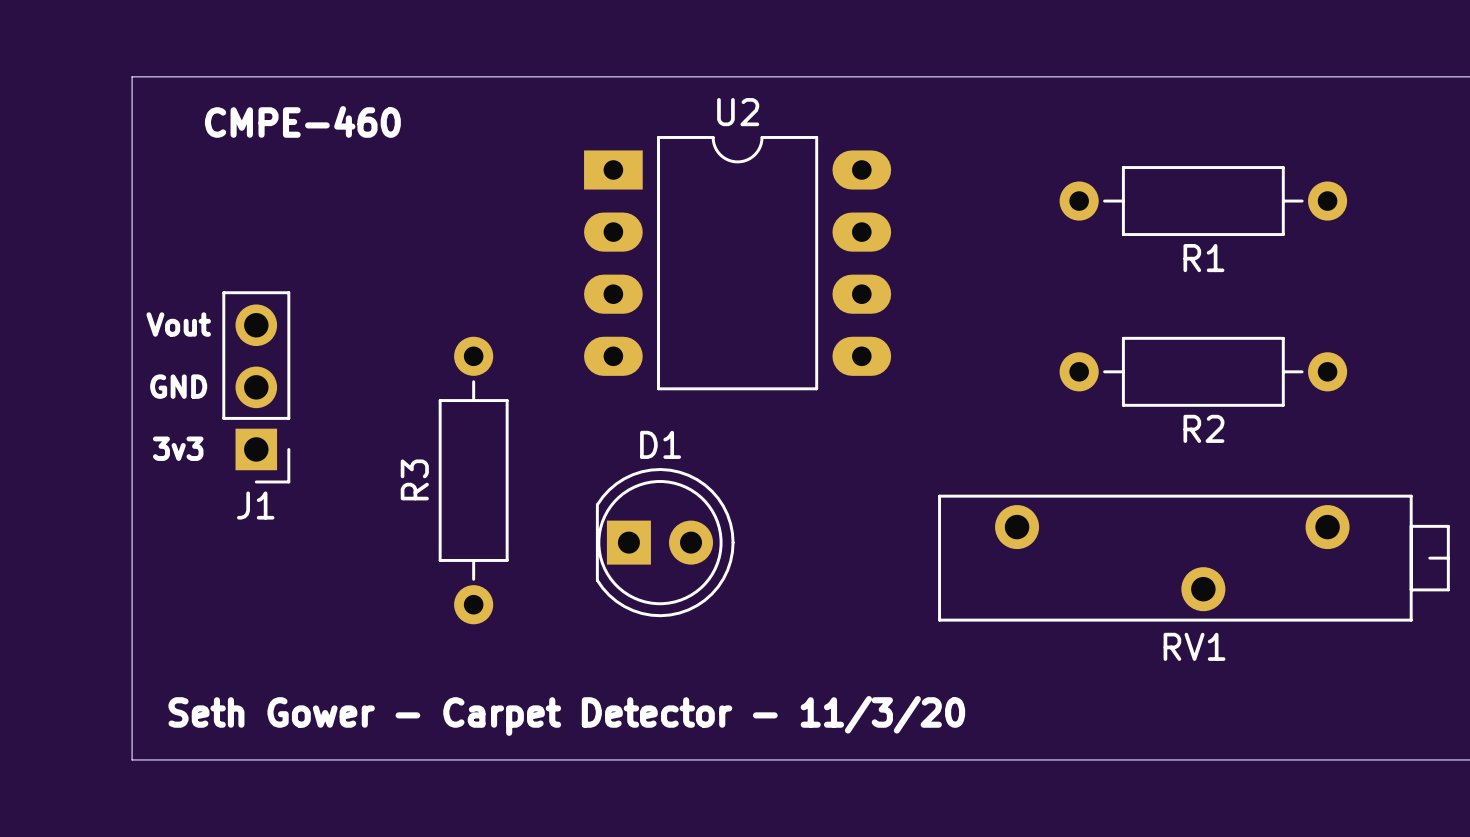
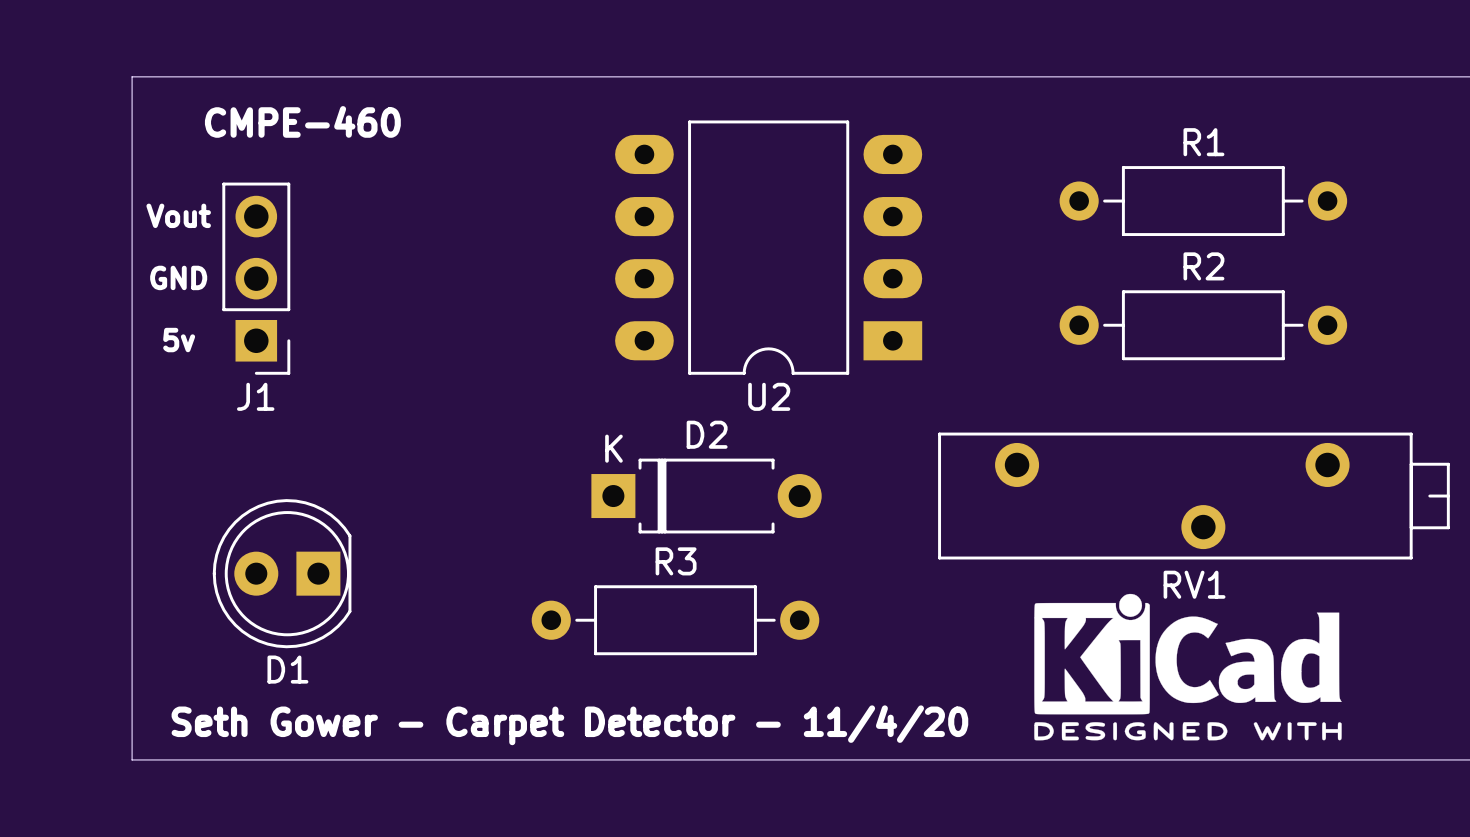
R1 name position: R1 (1203, 258) -> R1 (1203, 142)
U2 rotation: 0° (737, 263) -> 180° (768, 247)
text position: Vout (178, 324) -> Vout (178, 215)
text: none -> 5v (179, 340)
R2 position: (1203, 371) -> (1203, 325)
text position: GND (178, 386) -> GND (178, 277)
J1 position: (256, 387) -> (256, 278)
R2 name position: R2 (1203, 428) -> R2 (1203, 266)
text: 3v3 (178, 448) -> none
R3 rotation: 0° (473, 480) -> 90° clockwise (675, 620)
R3 position: (473, 480) -> (675, 620)
D2: none -> (706, 496)
D1 rotation: 0° (665, 542) -> 180° (282, 573)
D1 position: (665, 542) -> (282, 573)
RV1 position: (1193, 558) -> (1193, 496)
drawing: none -> [1034, 593, 1342, 741]
text: Seth Gower - Carpet Detector - 11/3/20 (566, 715) -> Seth Gower - Carpet Detector - 11/4/20 (569, 725)

